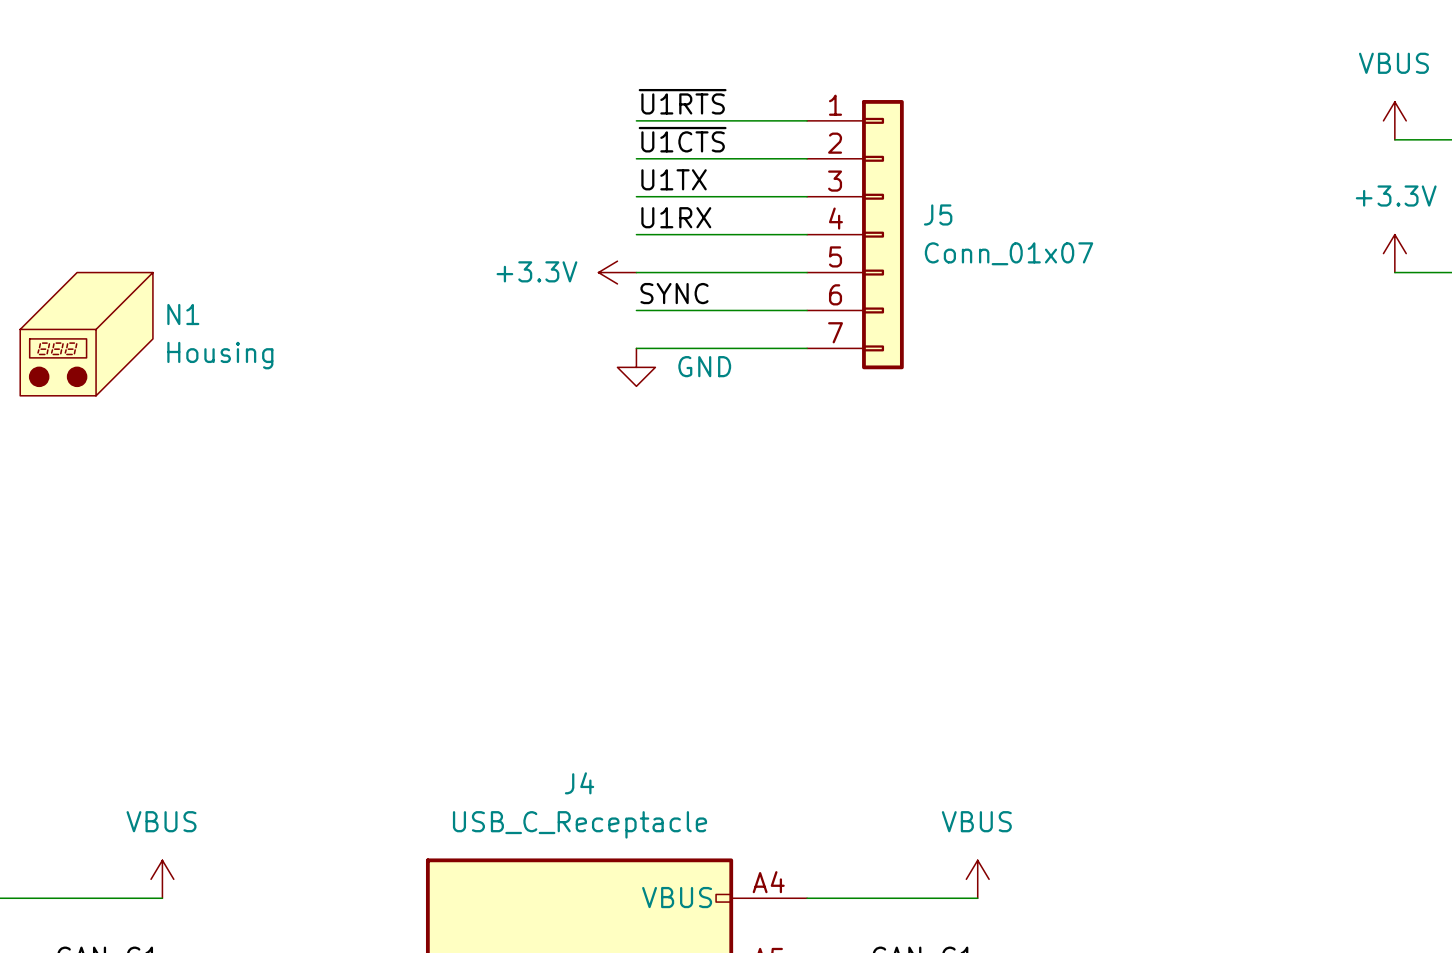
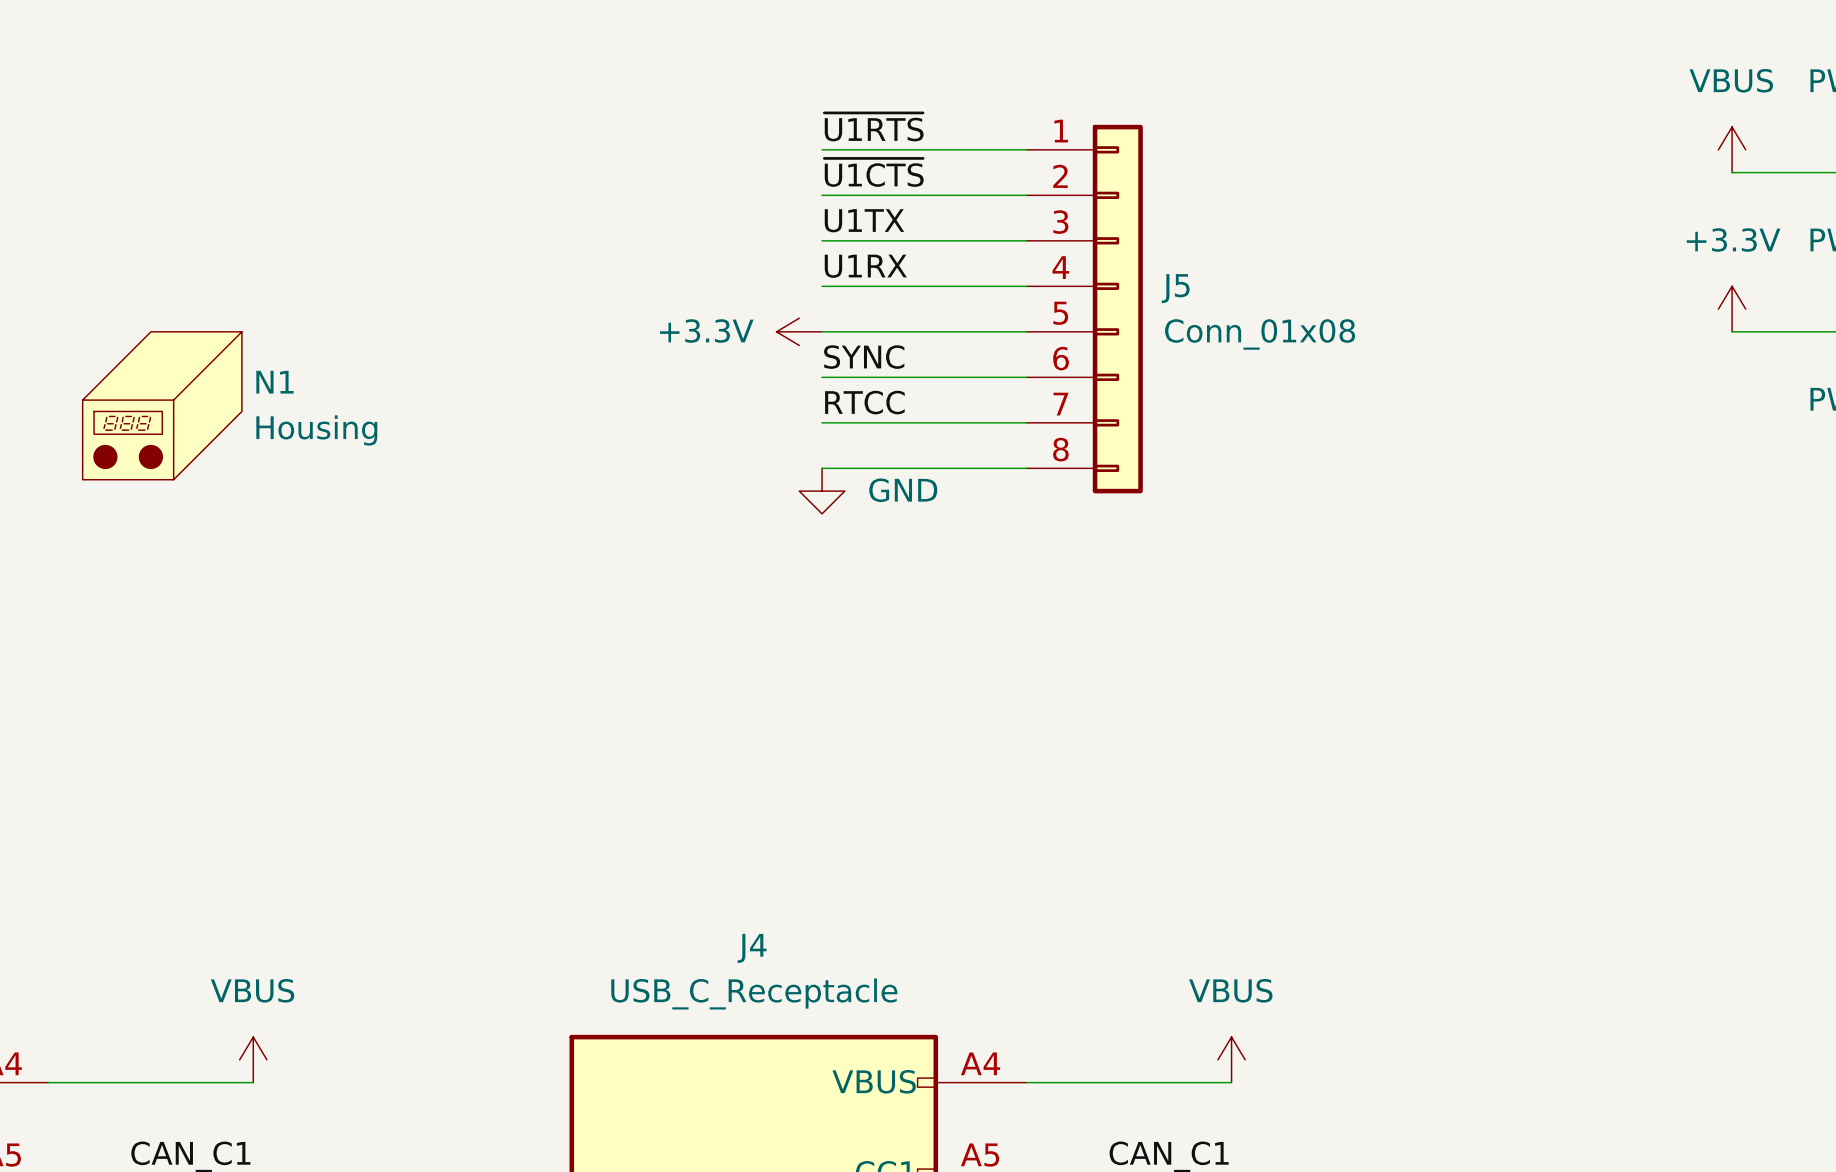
J5 symbol: [807, 100, 904, 370] -> [1026, 124, 1143, 494]
J5 value: Conn_01x07 (1009, 253) -> Conn_01x08 (1260, 334)
label: none -> RTCC (864, 402)
power symbol position: GND (636, 367) -> GND (822, 491)
wire: none -> (822, 468) (1026, 468)

